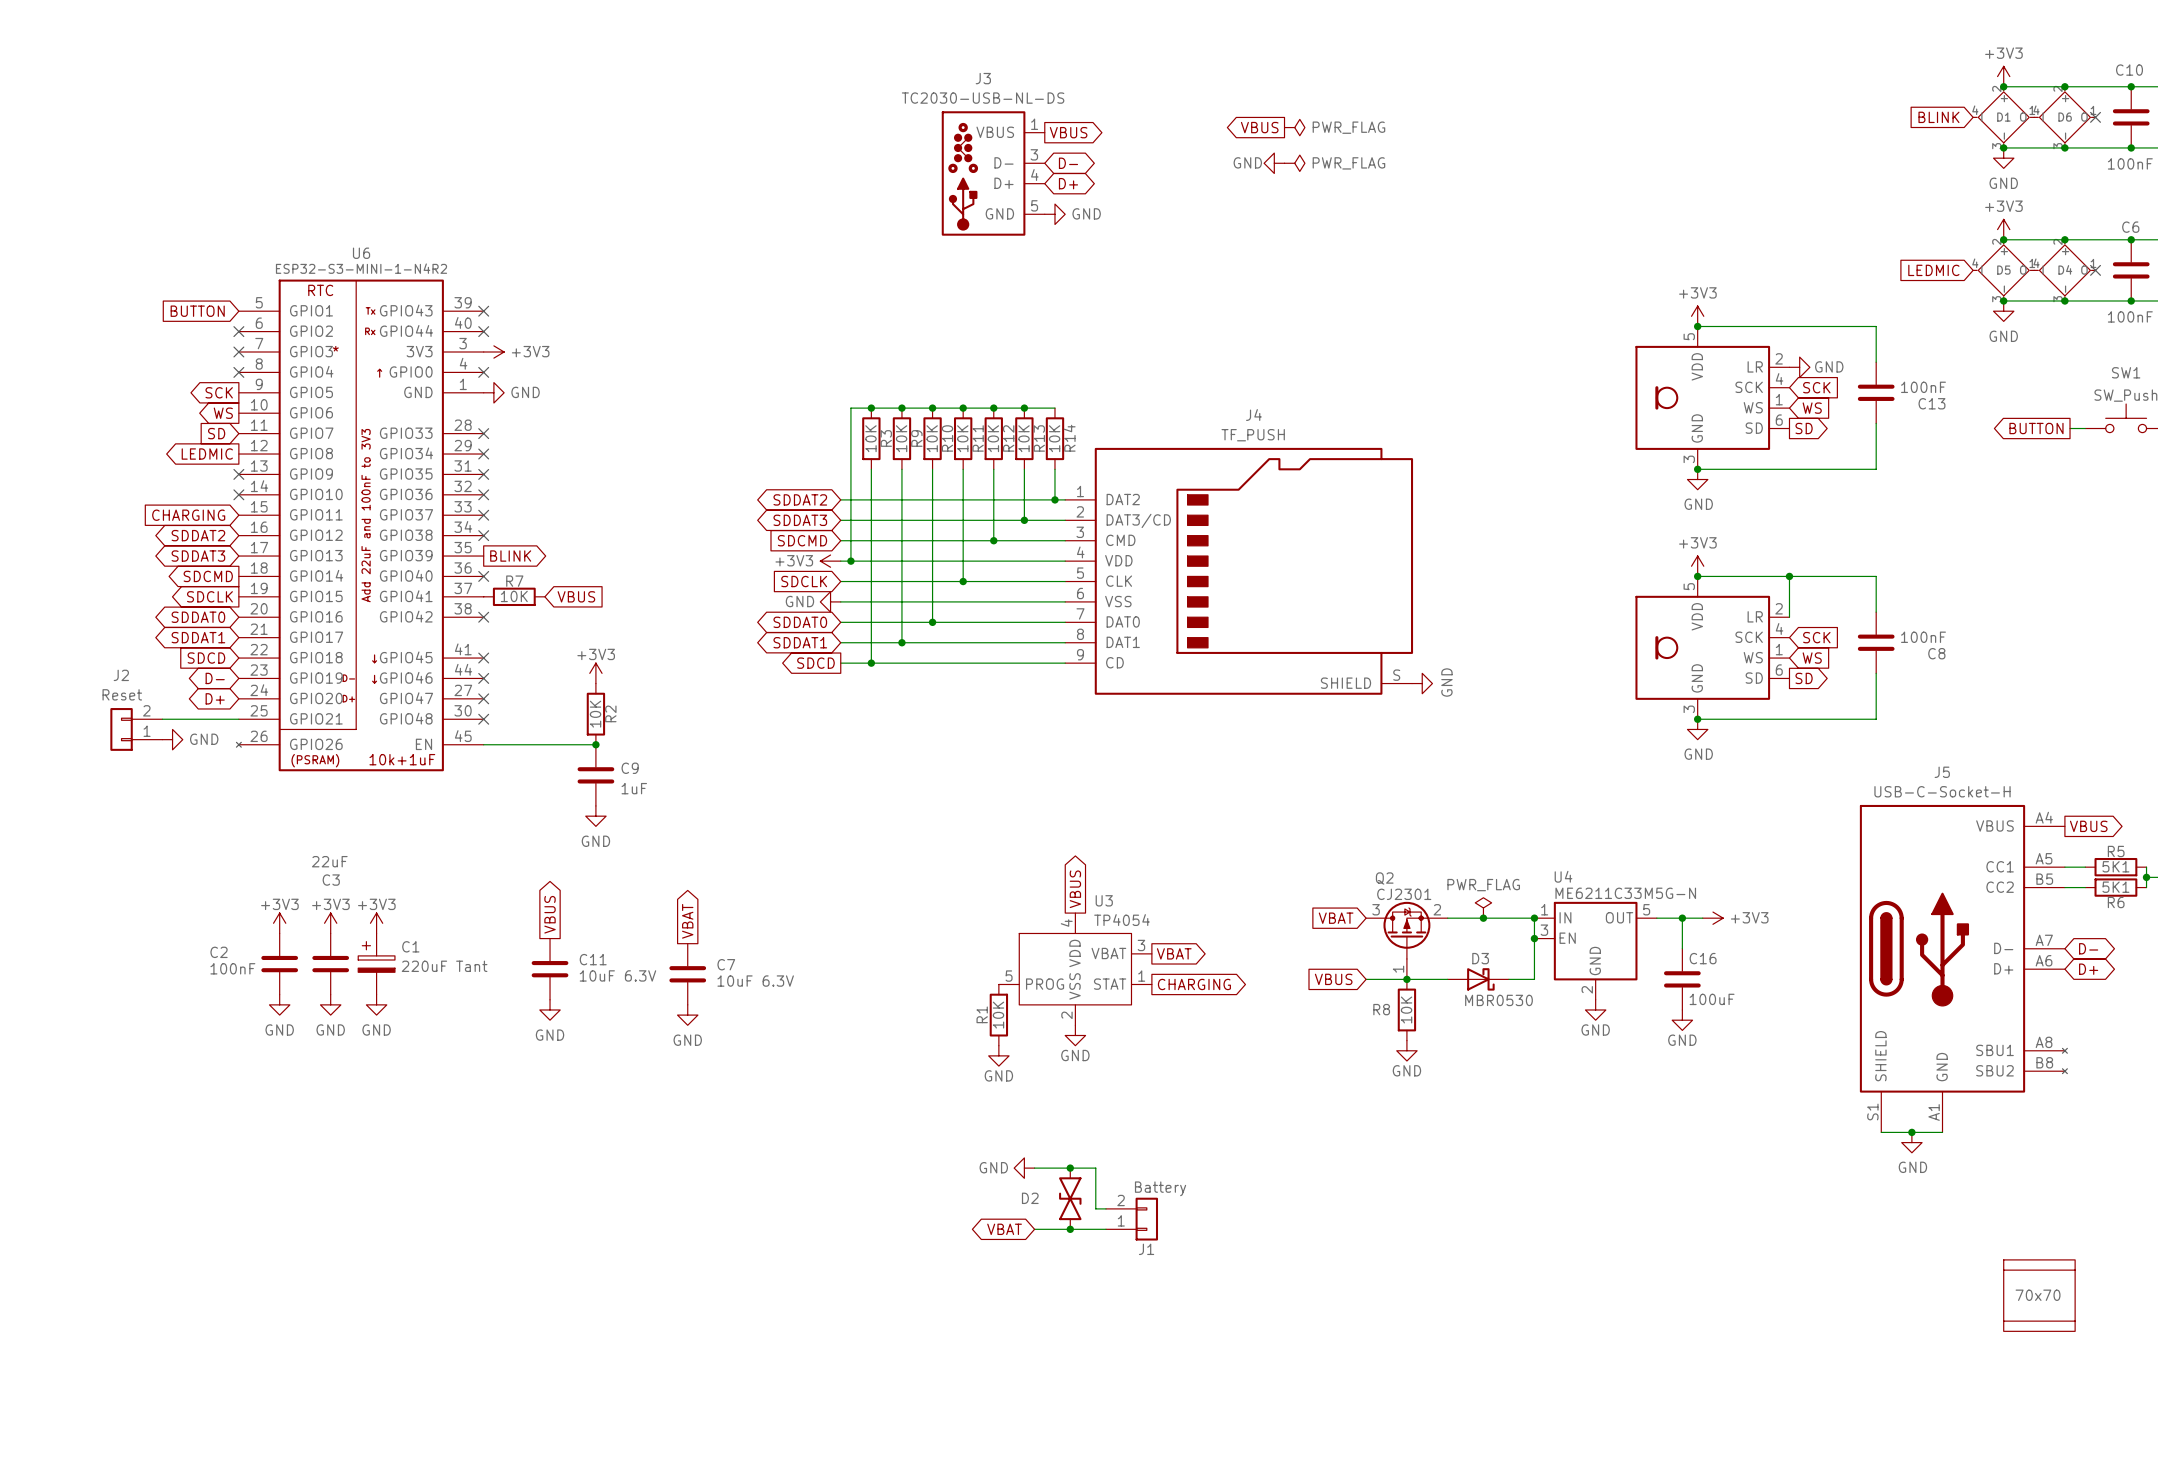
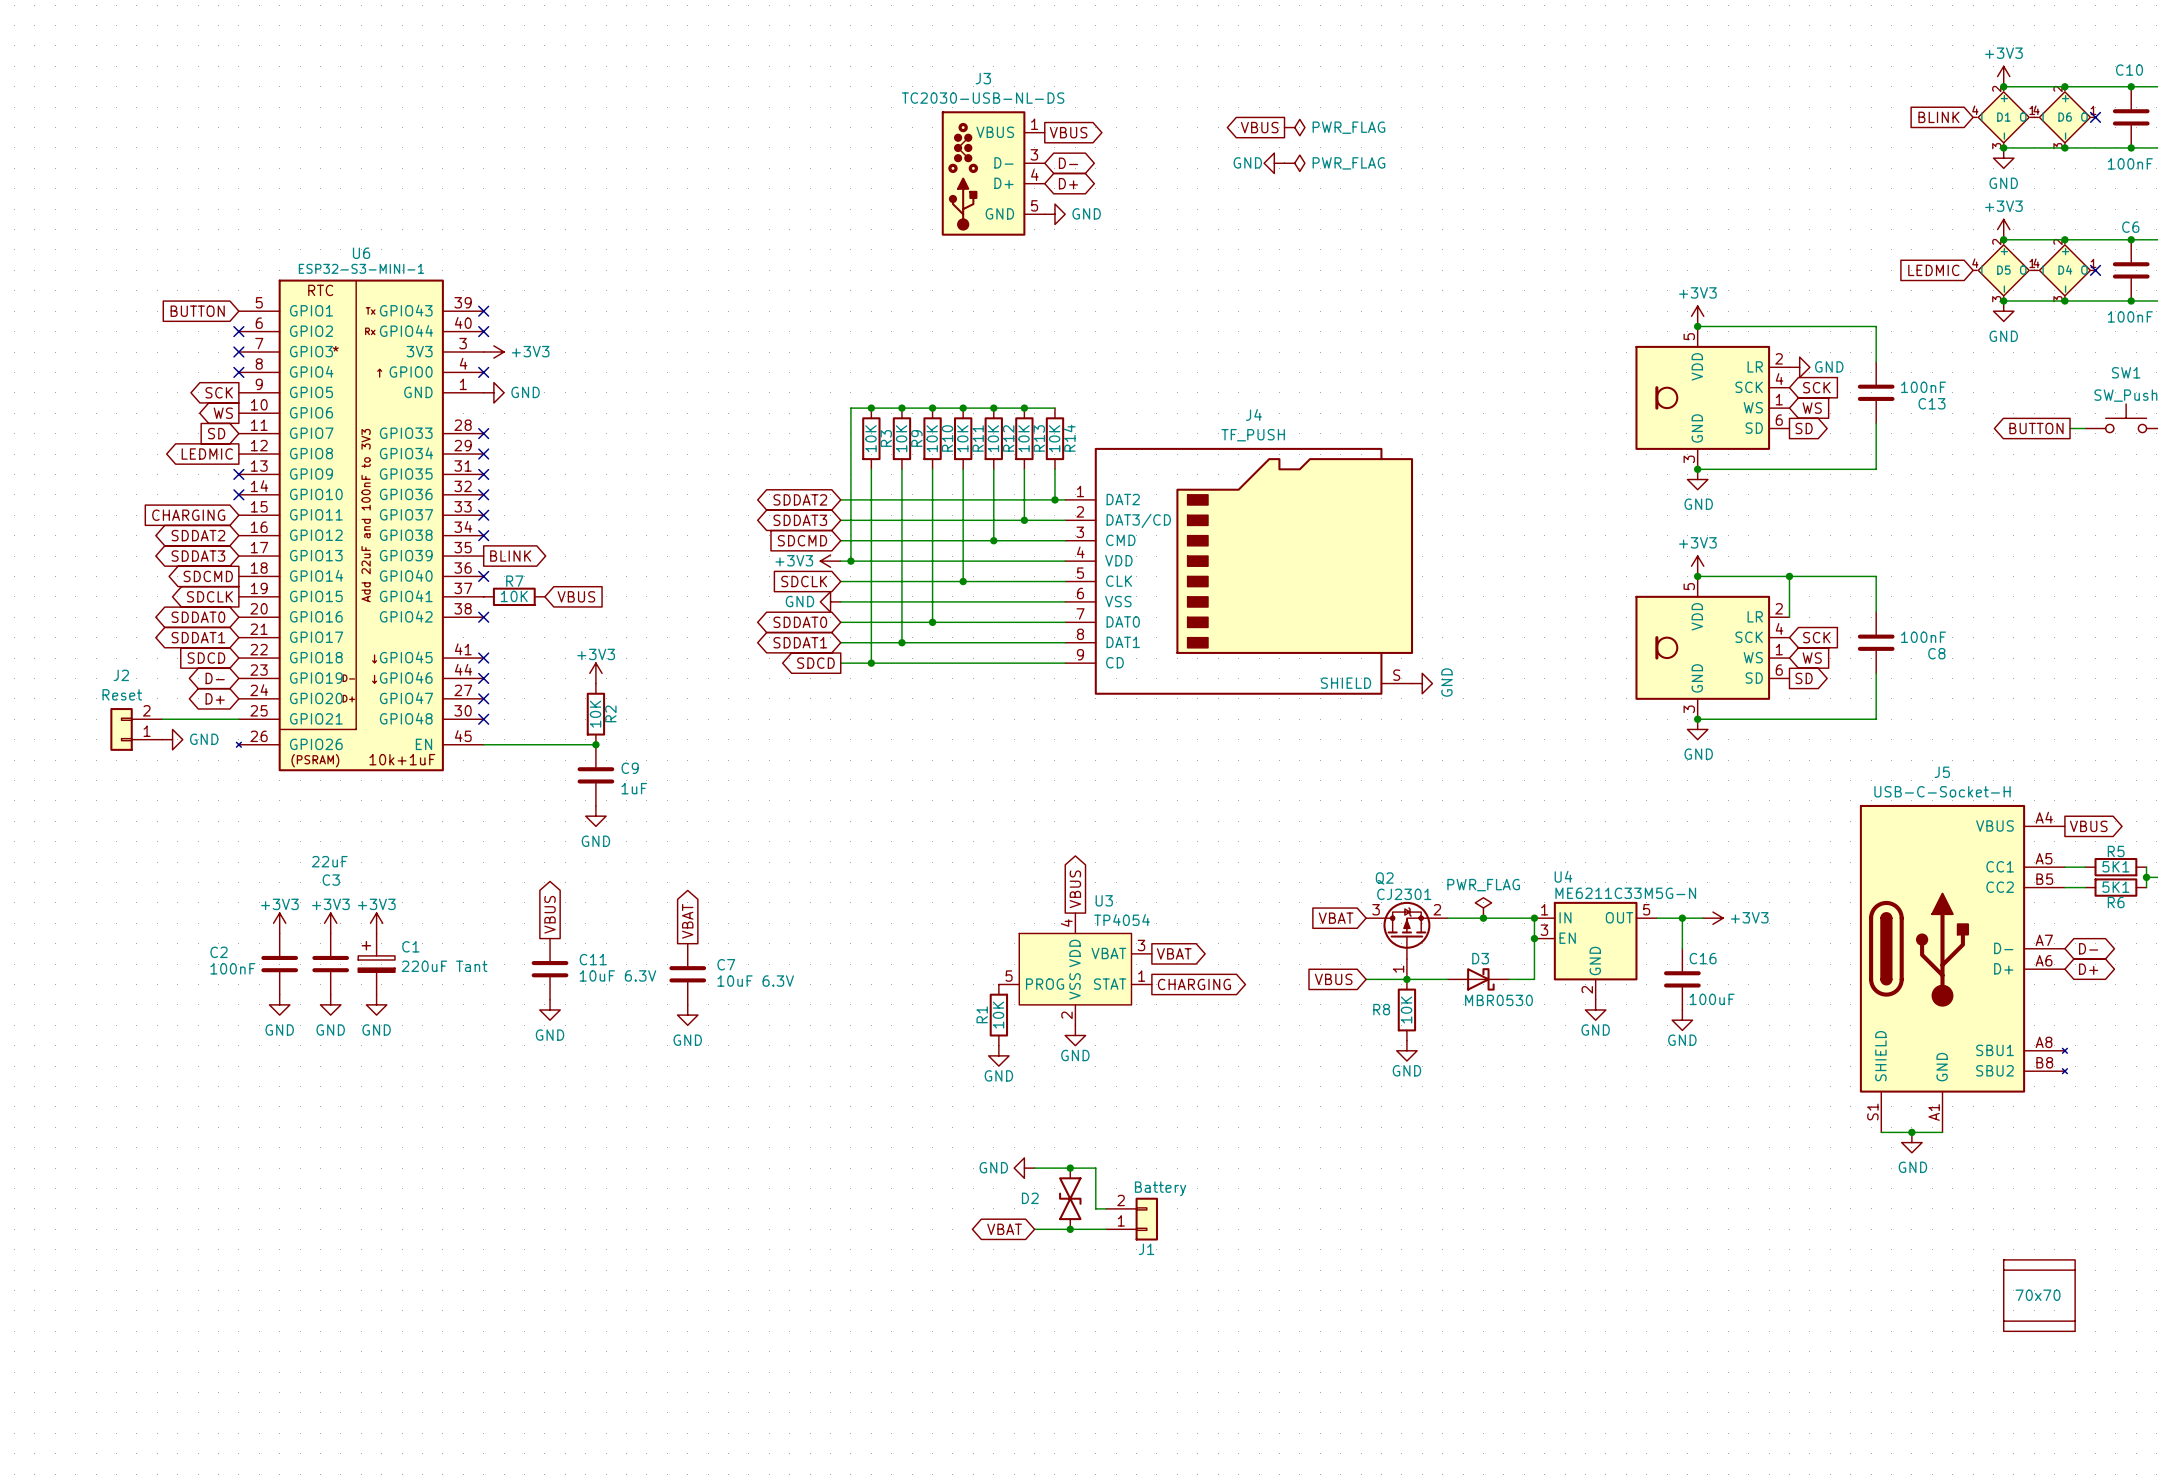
U6 value: ESP32-S3-MINI-1-N4R2 (361, 268) -> ESP32-S3-MINI-1 (361, 268)

